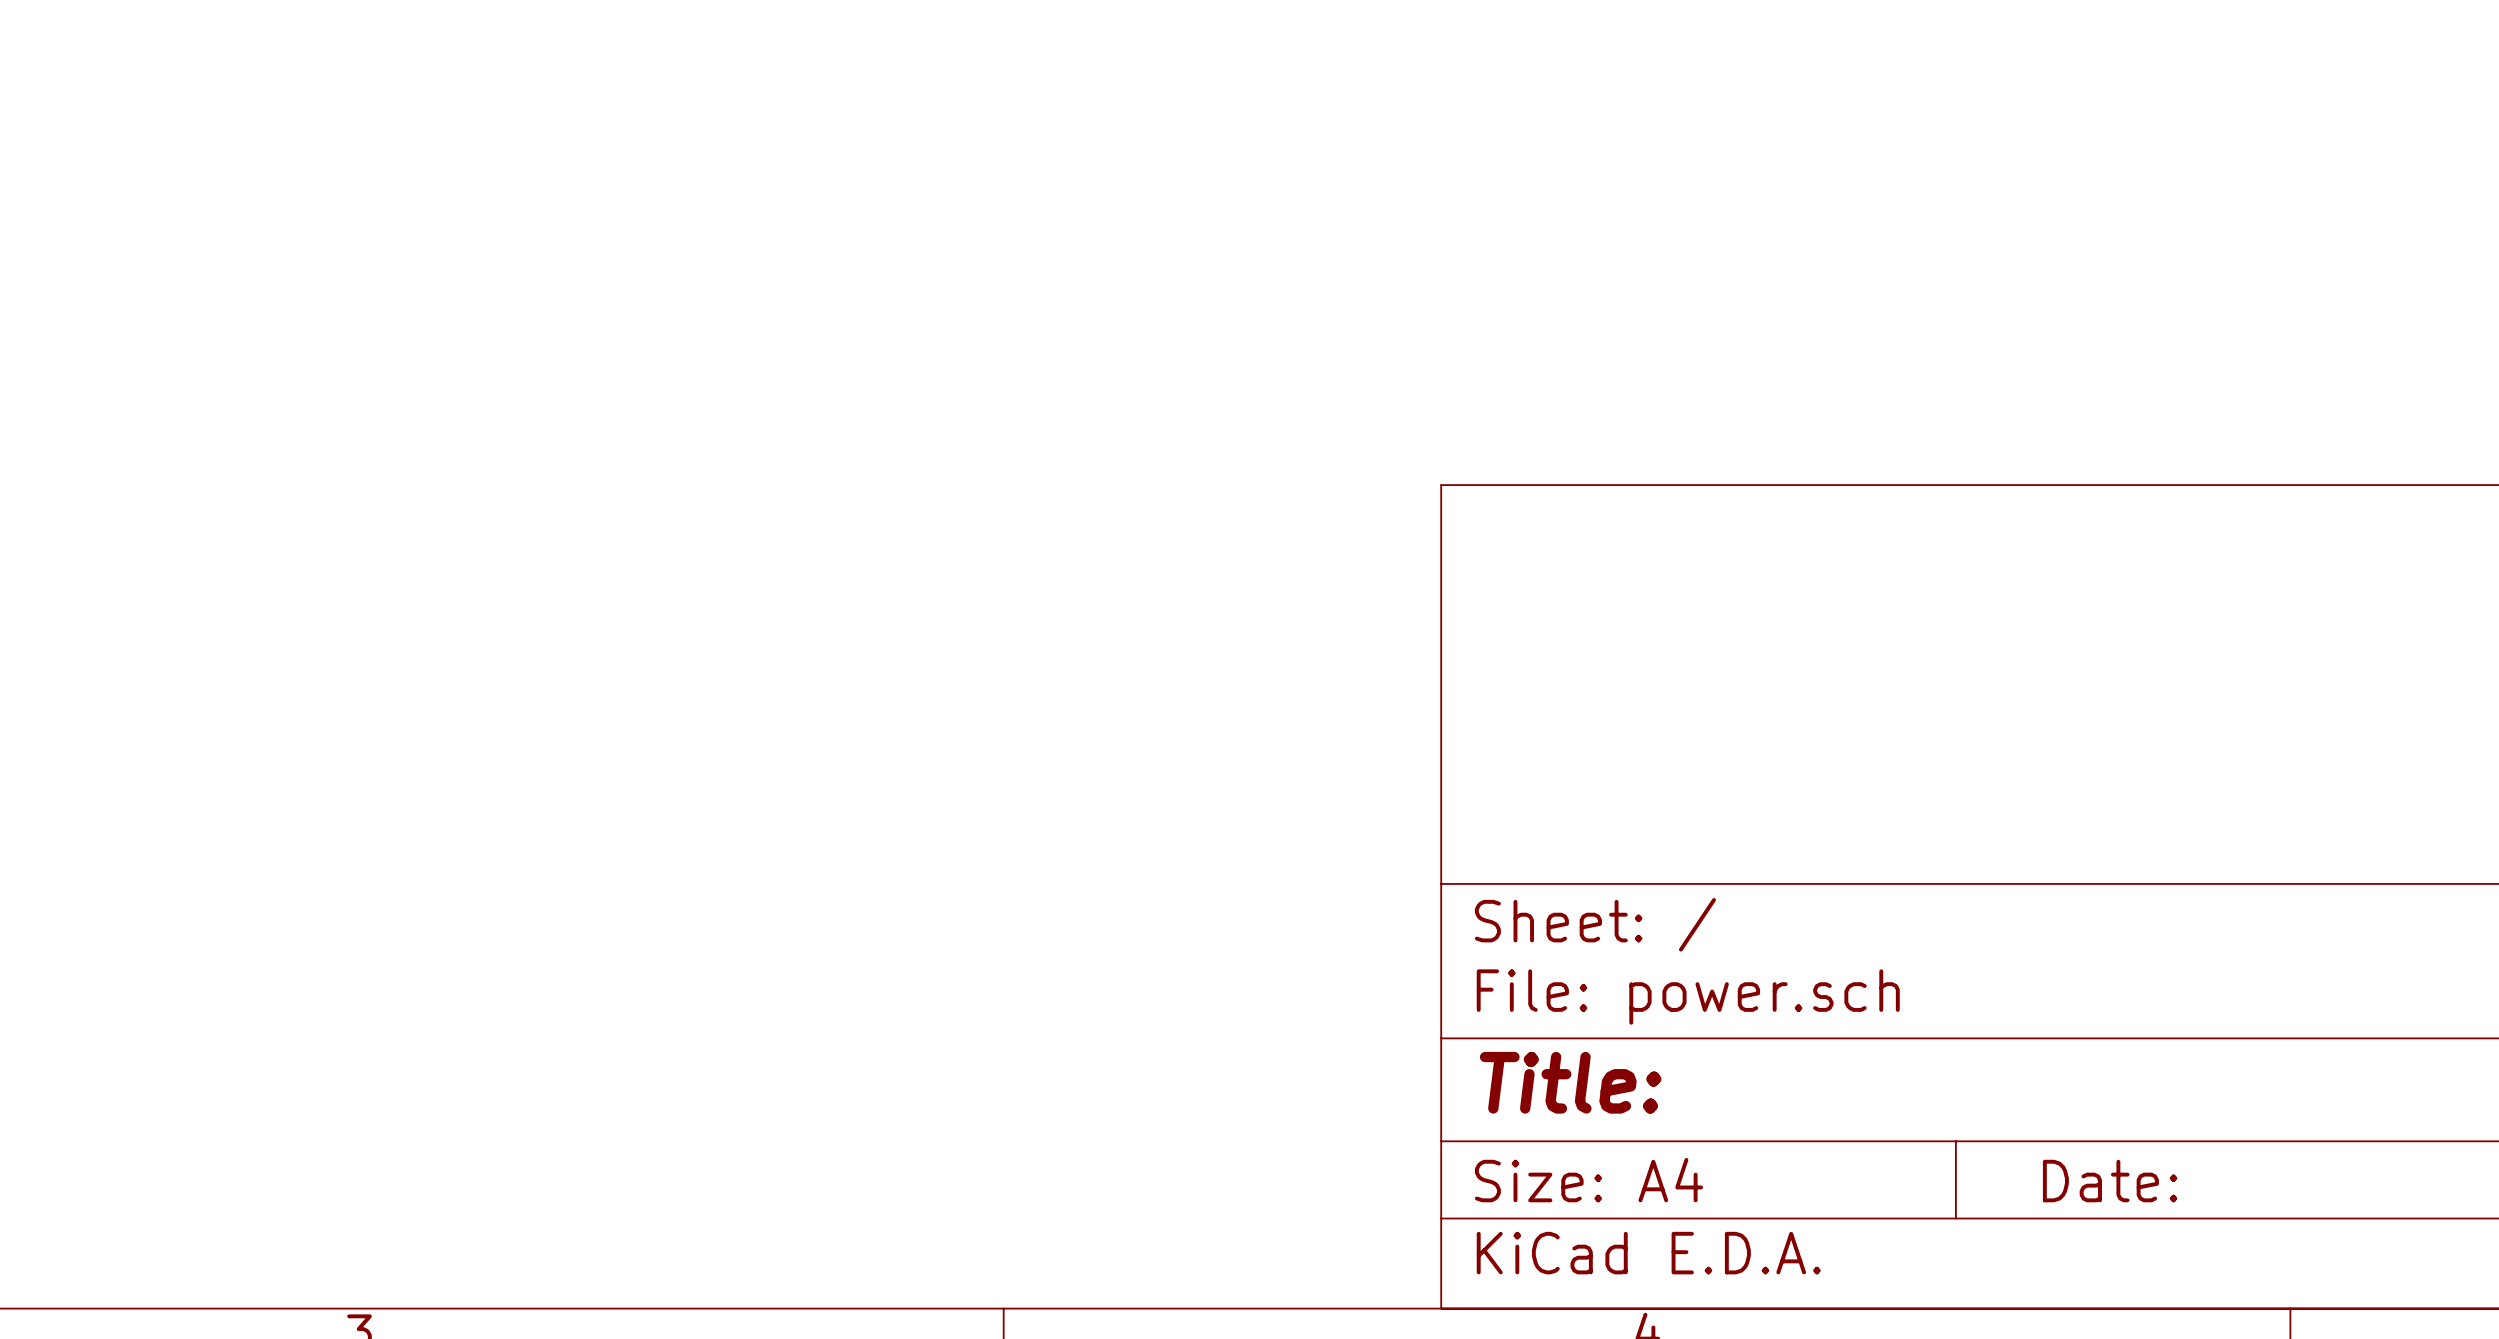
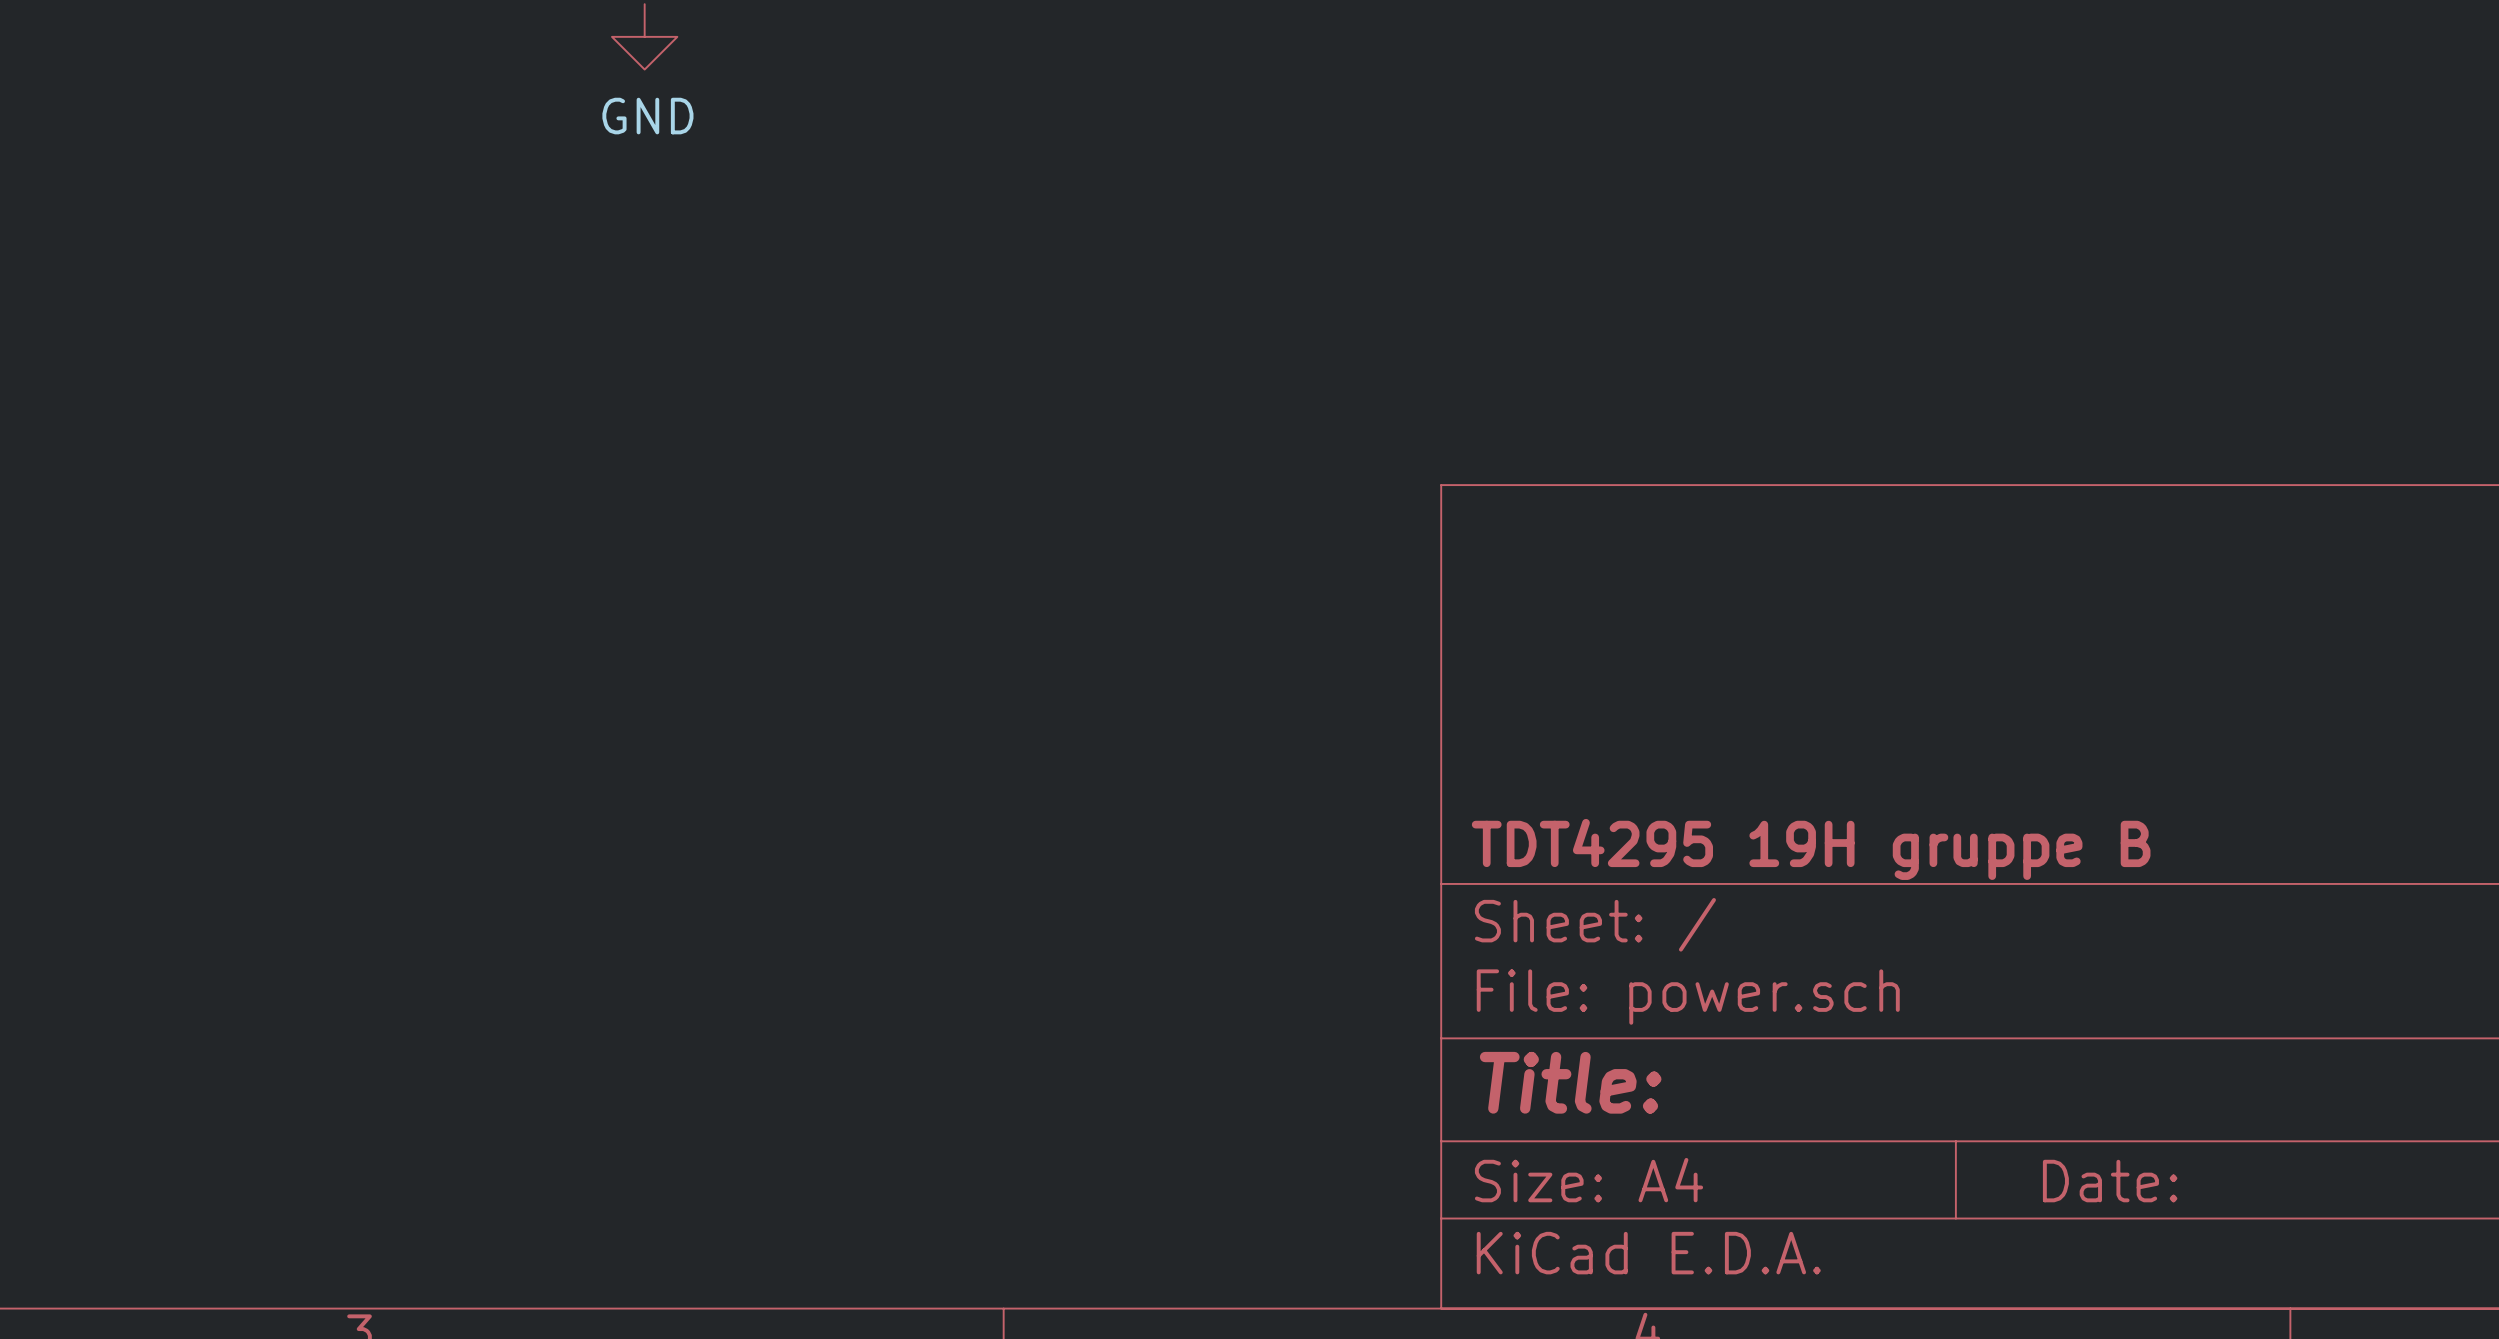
power symbol: none -> GND (644, 36)
title block: none -> TDT4295 19H gruppe B (1811, 849)

